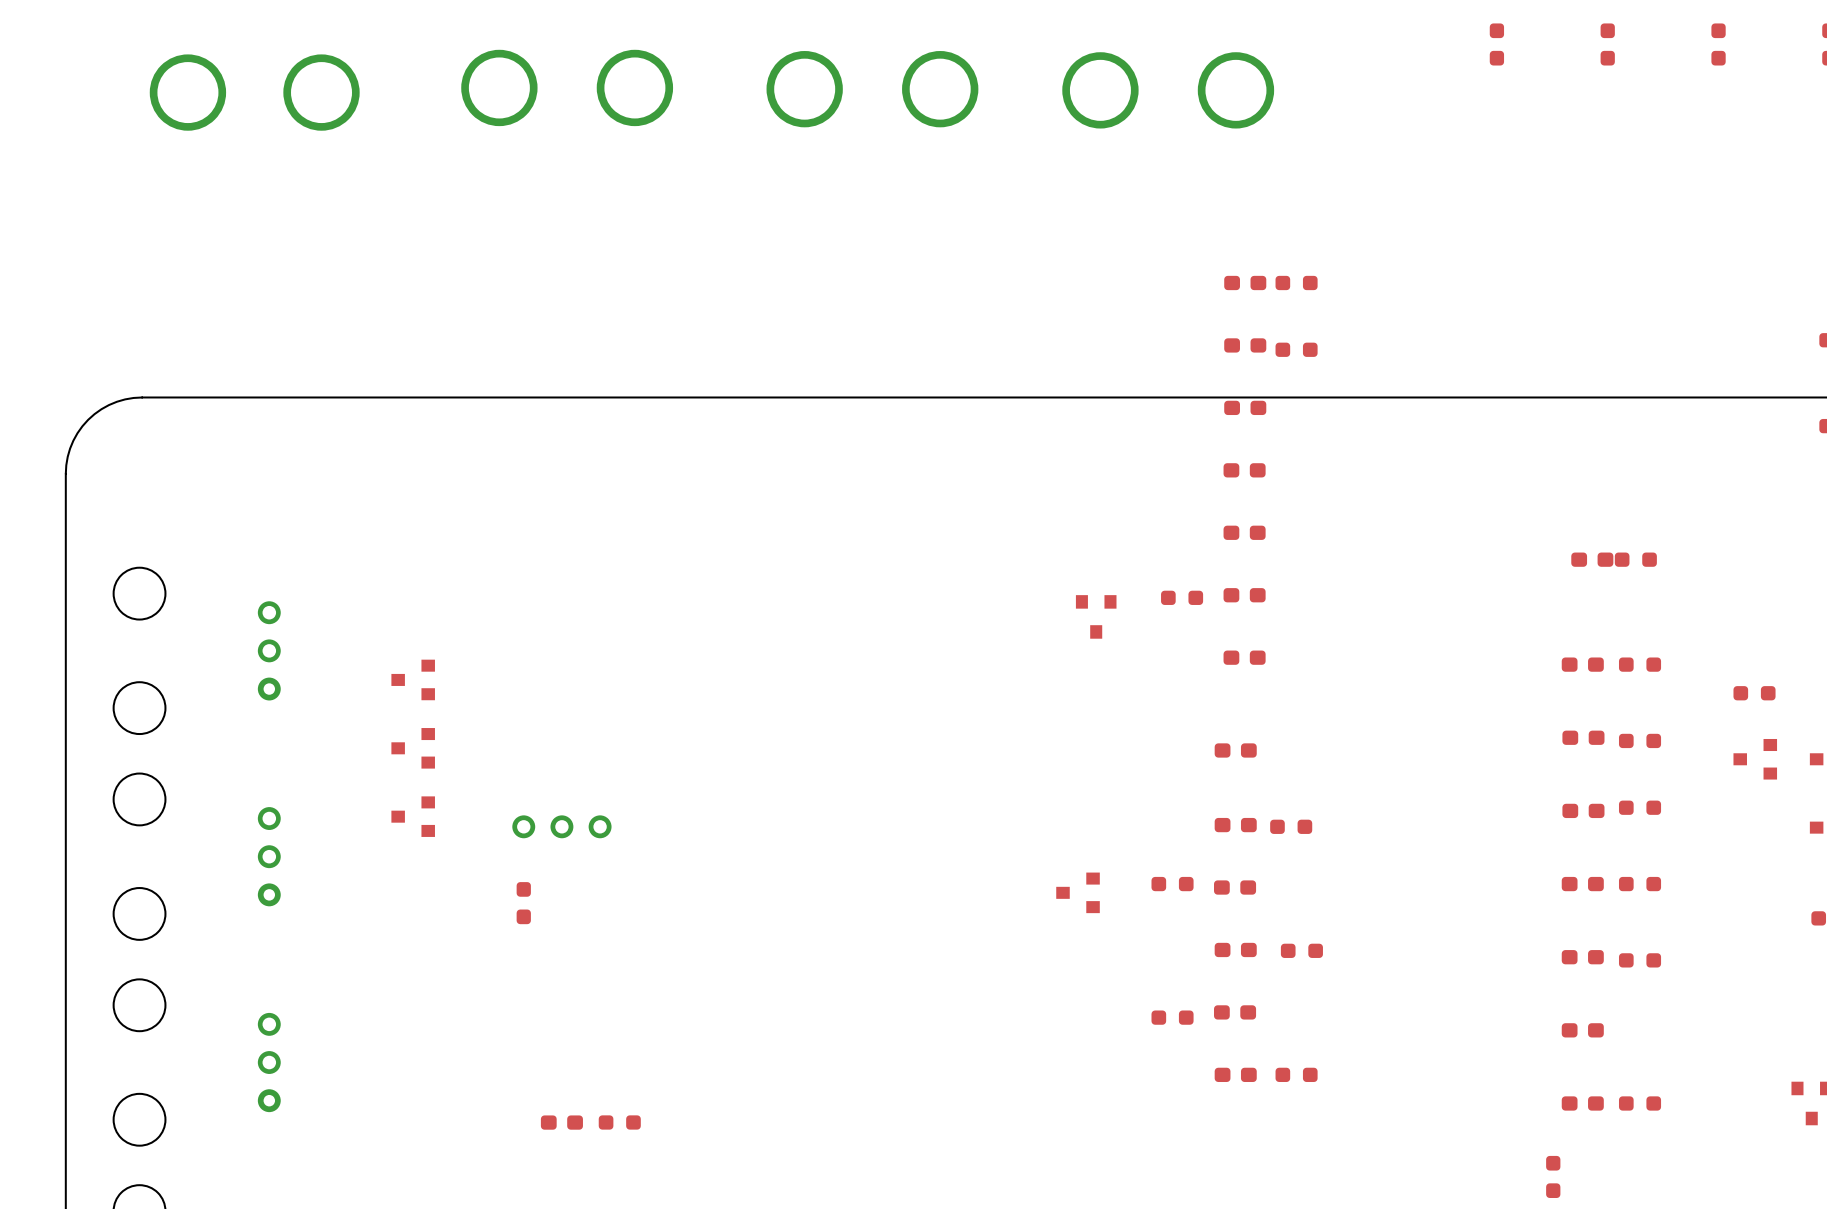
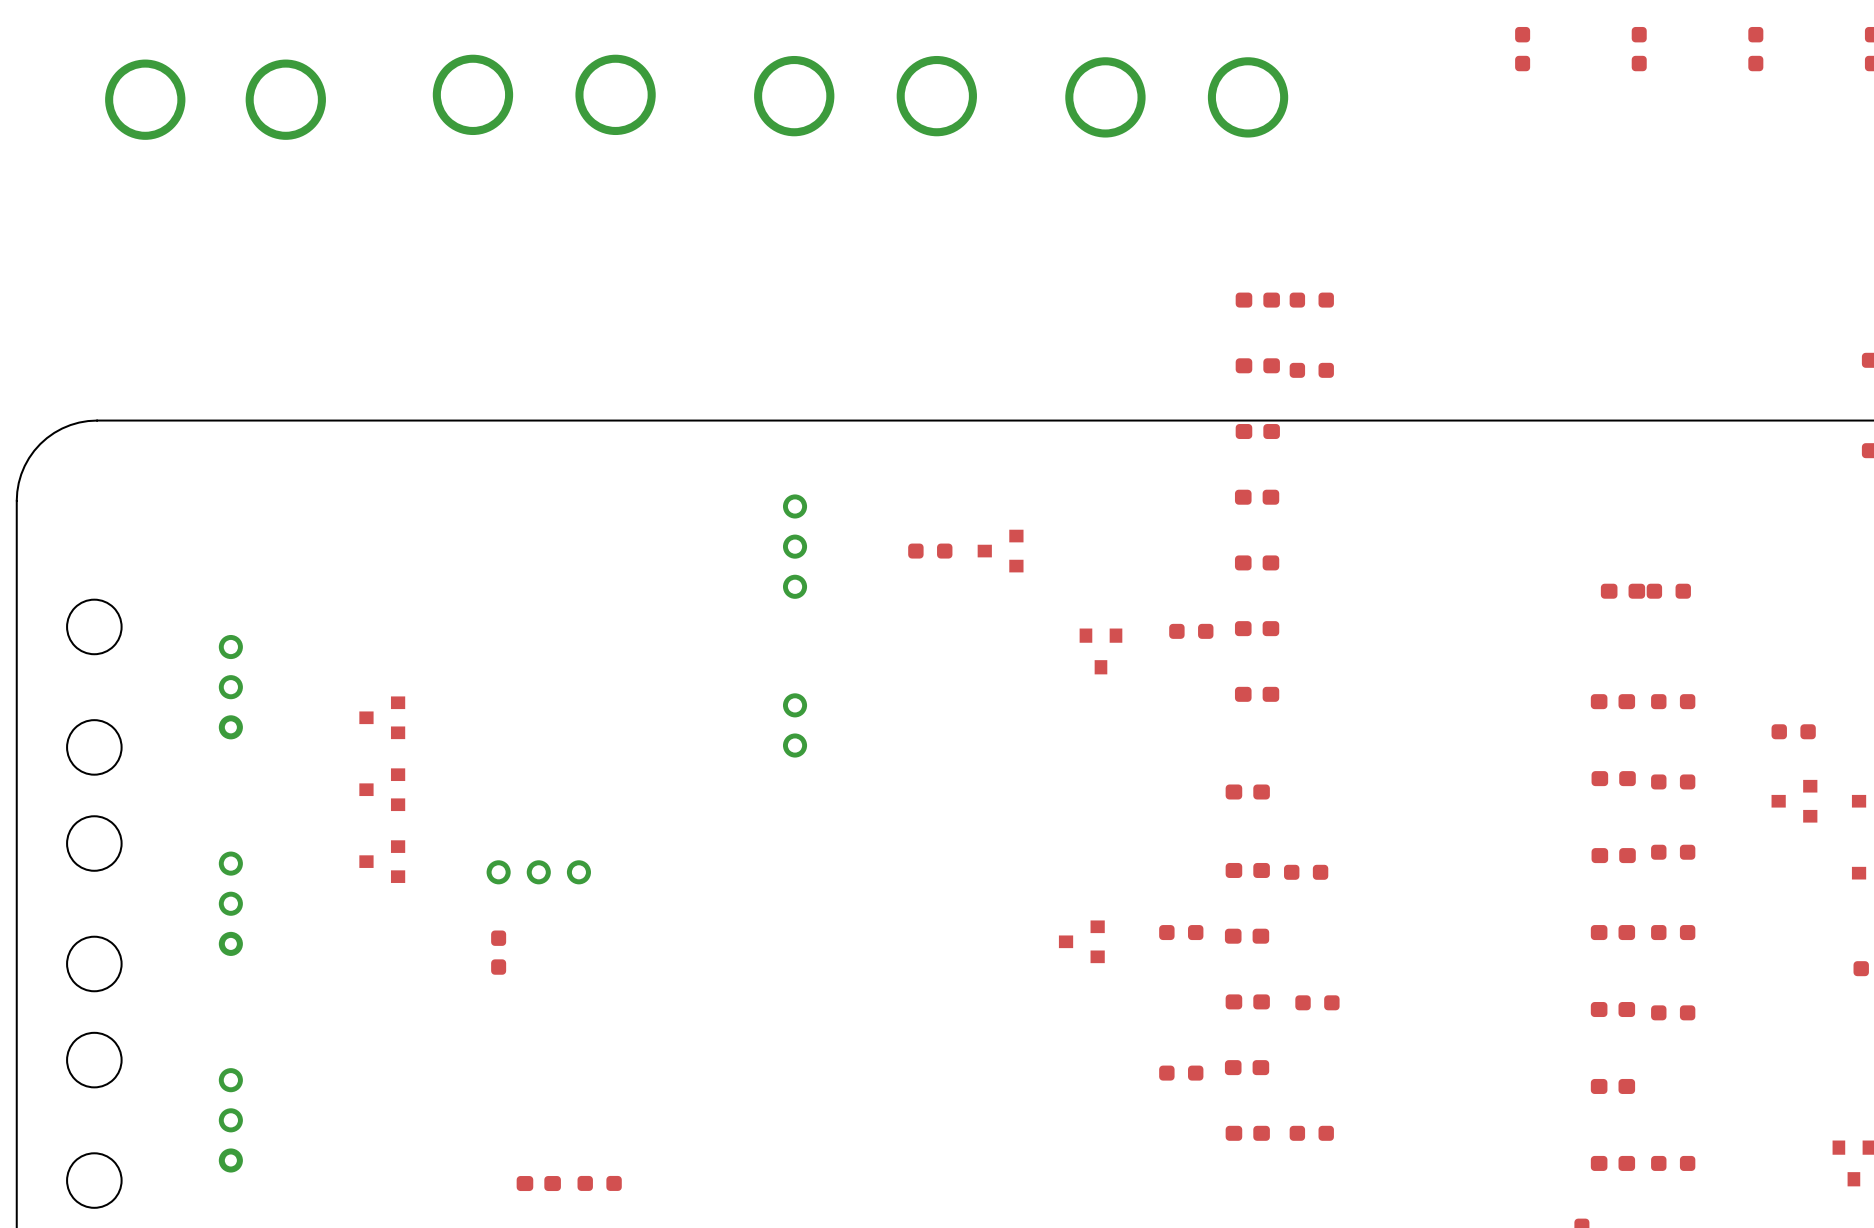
part: none -> (795, 546)
part: none -> (930, 551)
part: none -> (1000, 551)
part: none -> (795, 725)

